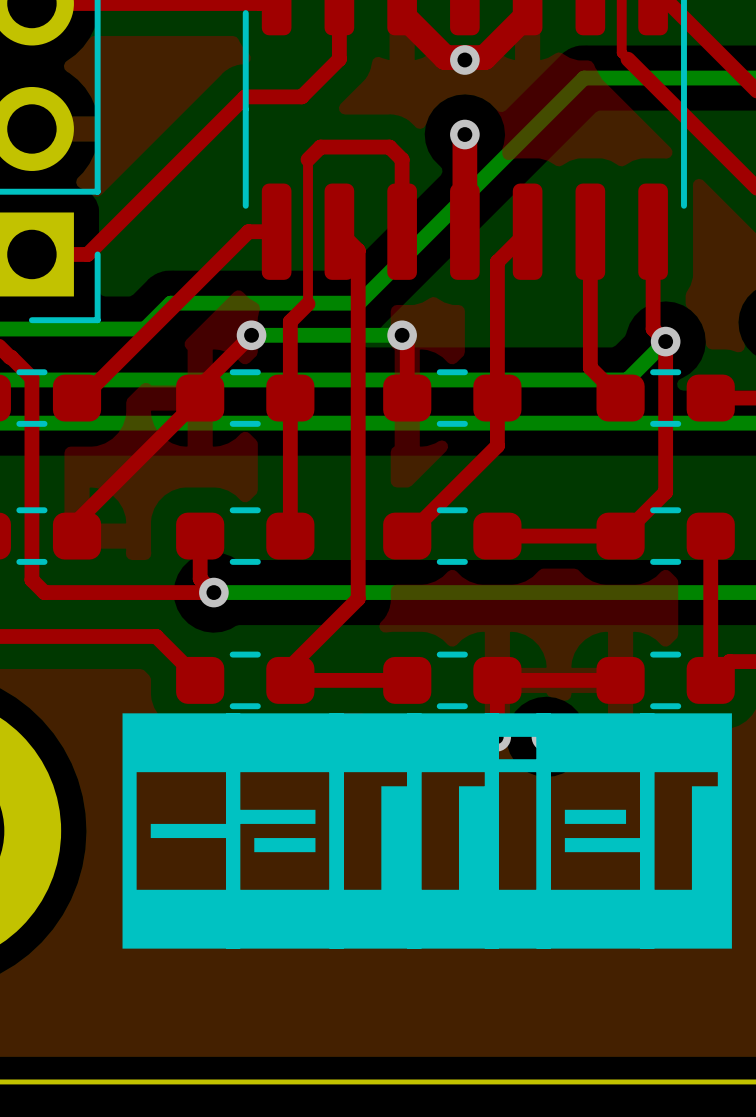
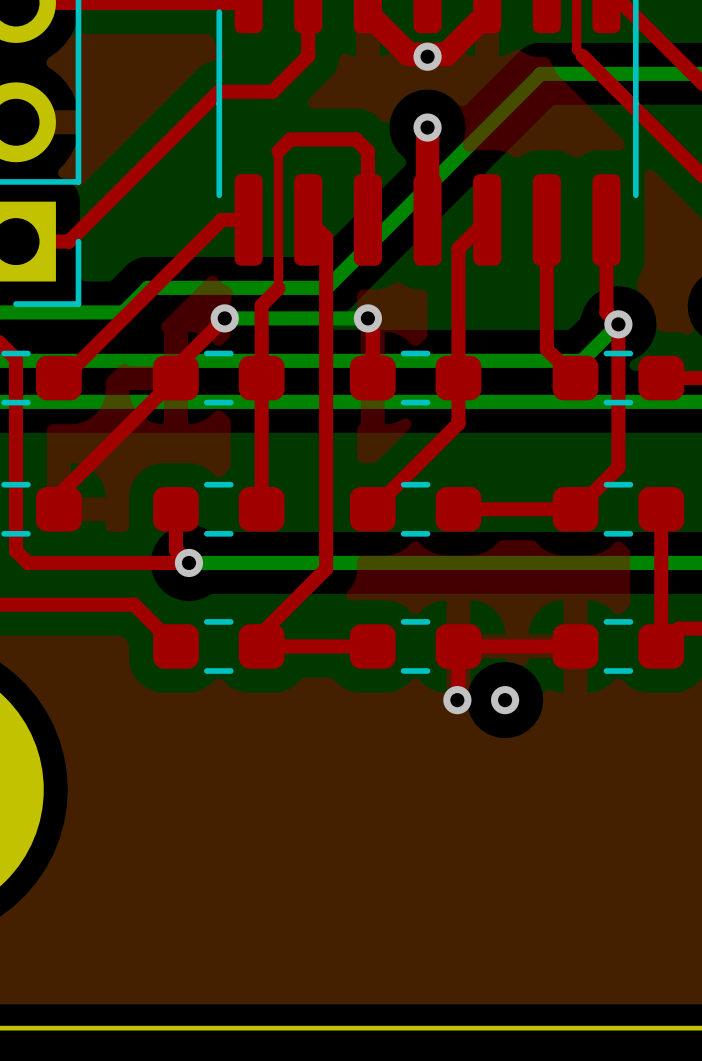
drawing: [122, 713, 732, 949] -> none

